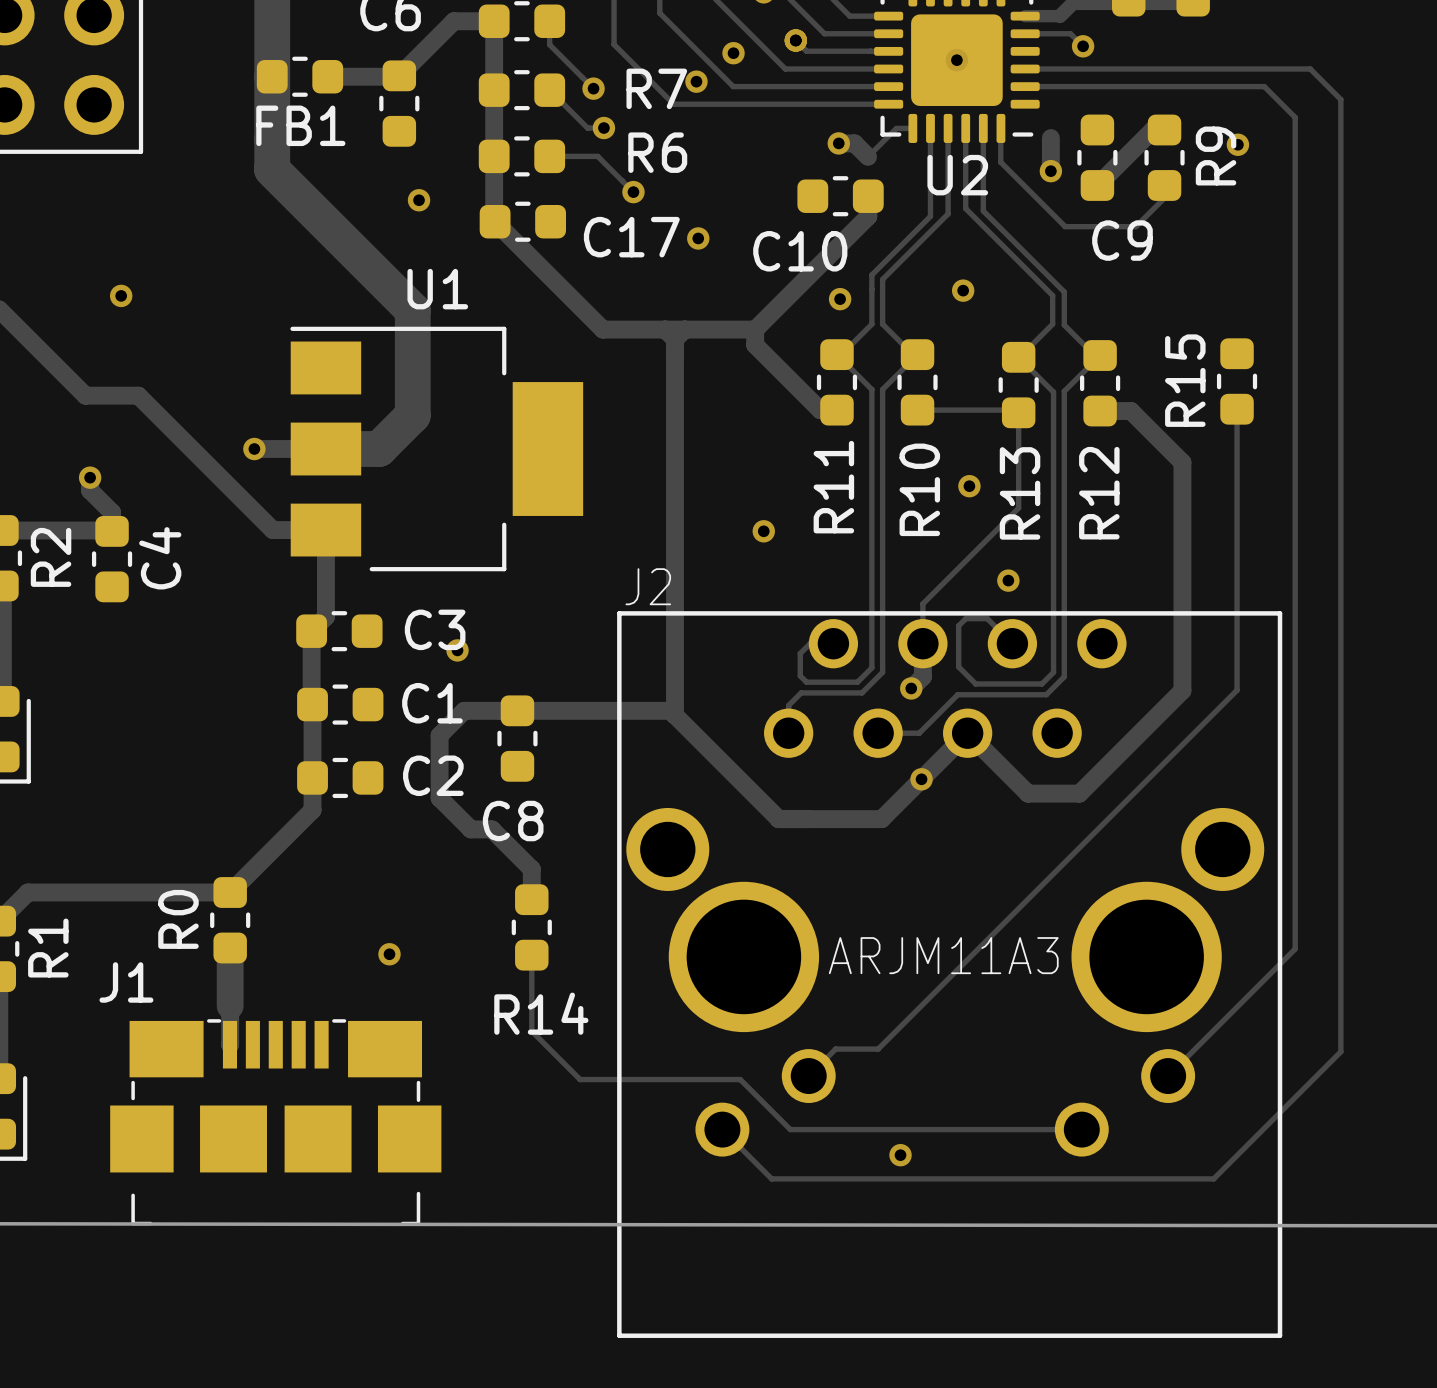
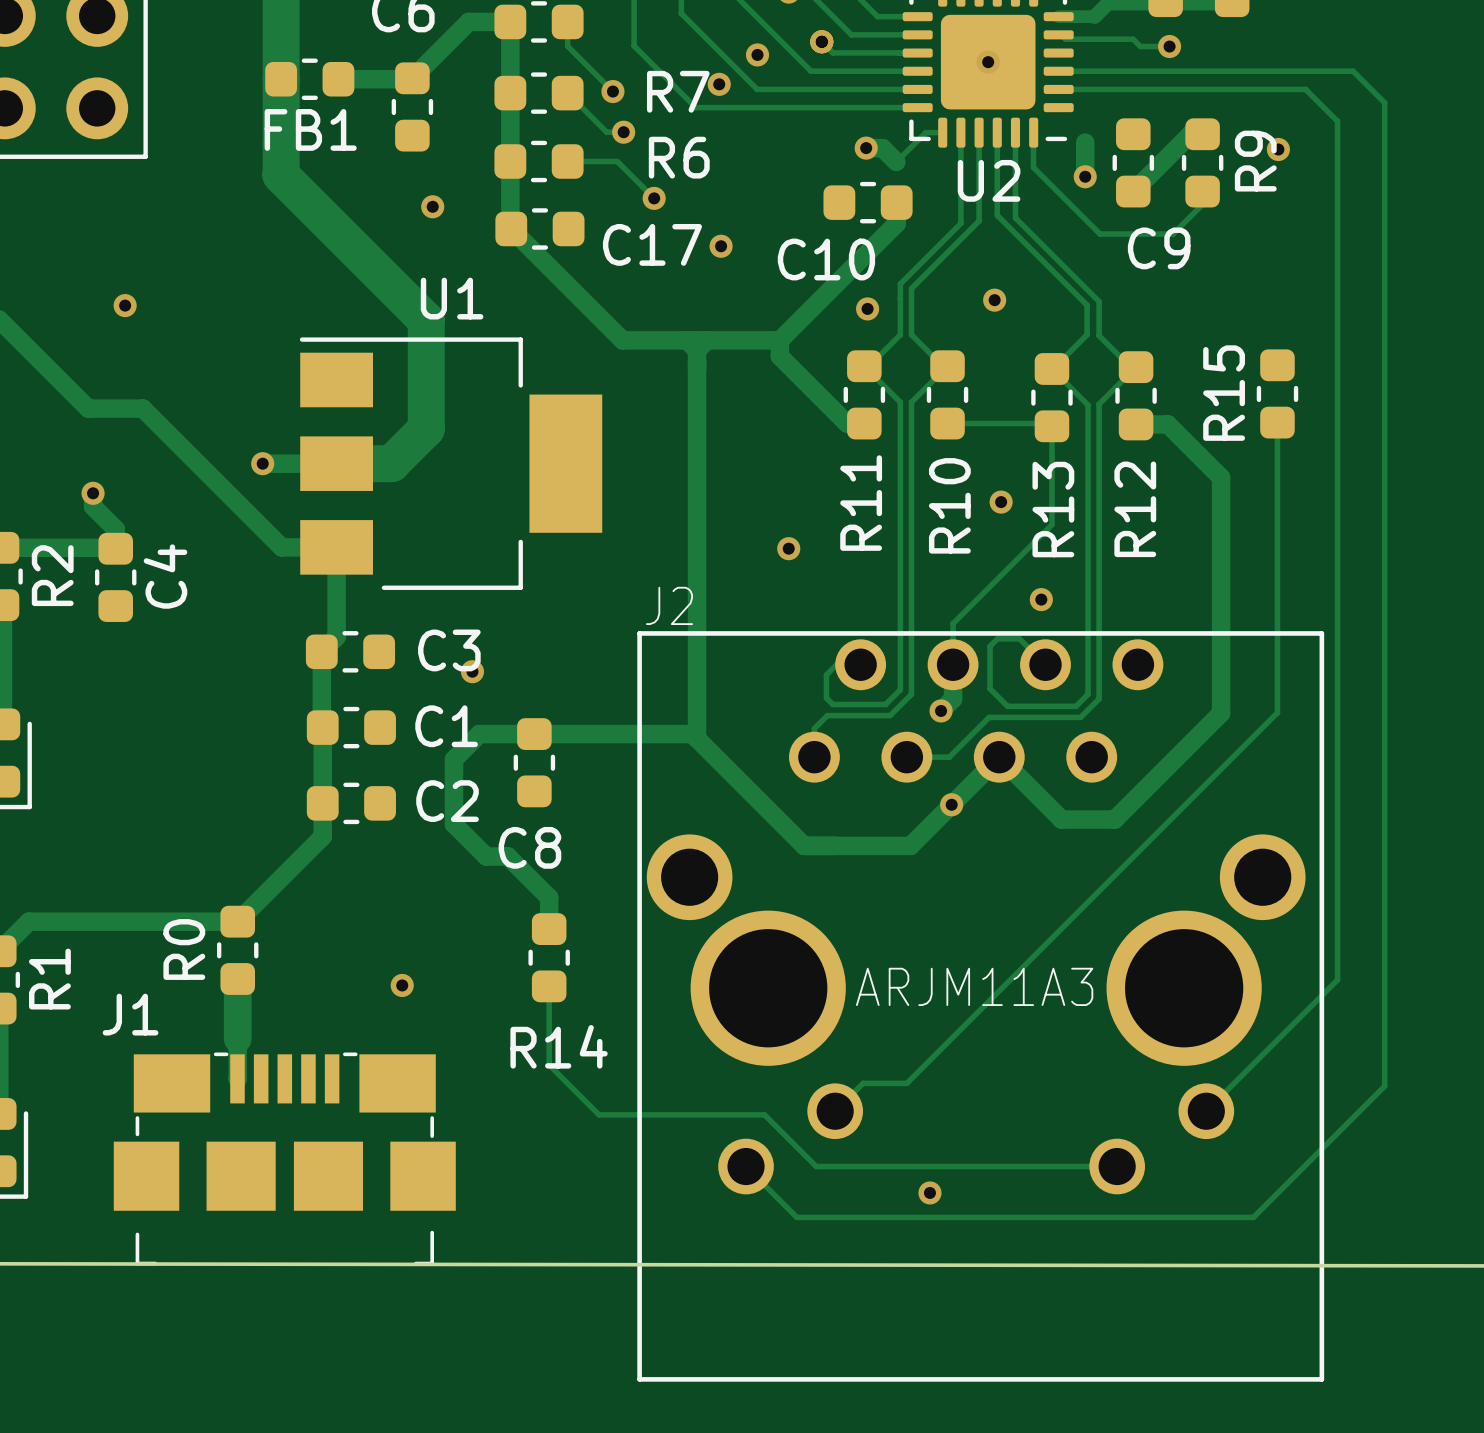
track: (1027, 33) (1070, 33) (1084, 47) -> (1061, 34) (1065, 39) (1133, 39) (1140, 46) (1169, 46)
via position: (1083, 46) -> (1169, 46)

